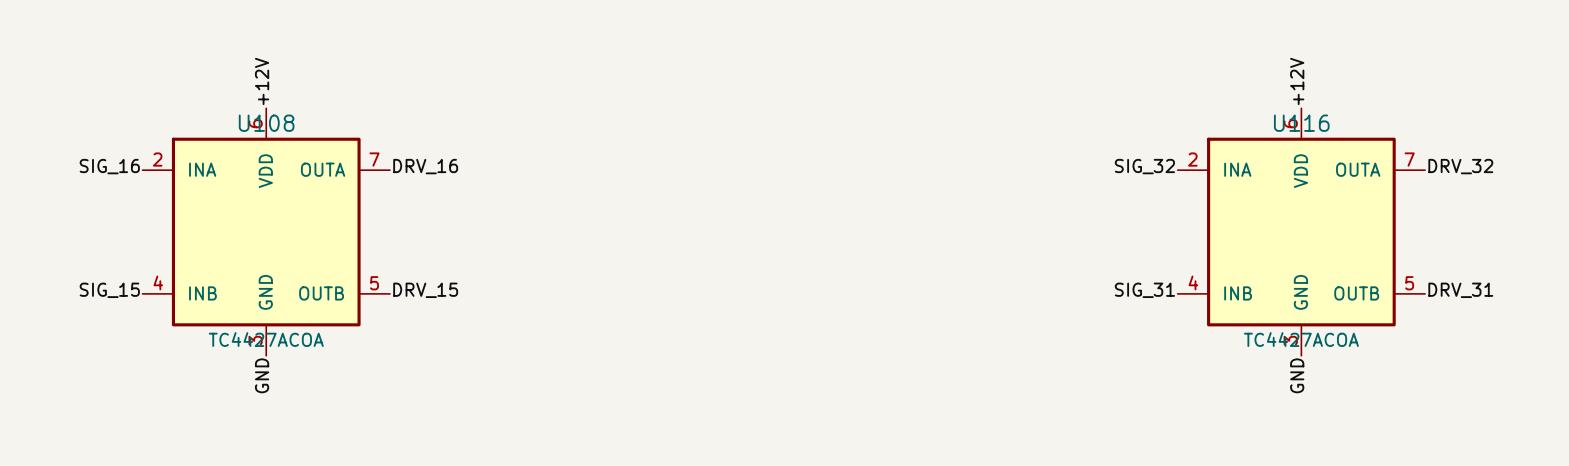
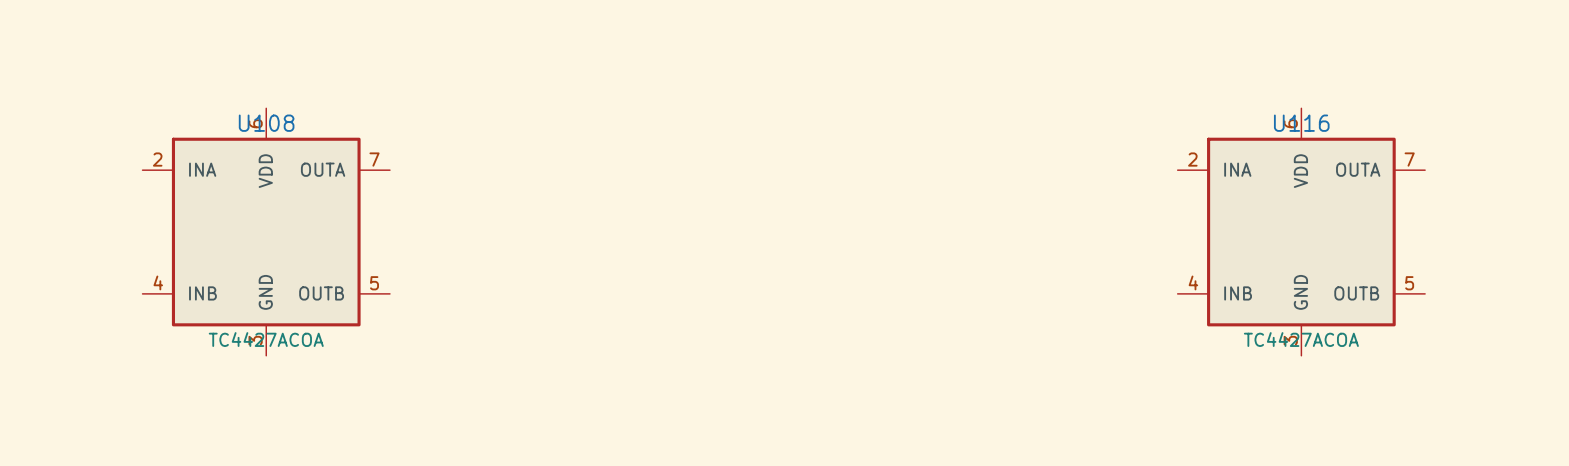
label: +12V (262, 81) -> none
label: +12V (1297, 81) -> none
label: SIG_16 (109, 166) -> none
label: DRV_16 (425, 166) -> none
label: SIG_32 (1144, 166) -> none
label: DRV_32 (1460, 166) -> none
label: SIG_15 (109, 290) -> none
label: DRV_15 (425, 290) -> none
label: SIG_31 (1144, 290) -> none
label: DRV_31 (1460, 290) -> none
label: GND (262, 375) -> none
label: GND (1297, 375) -> none

